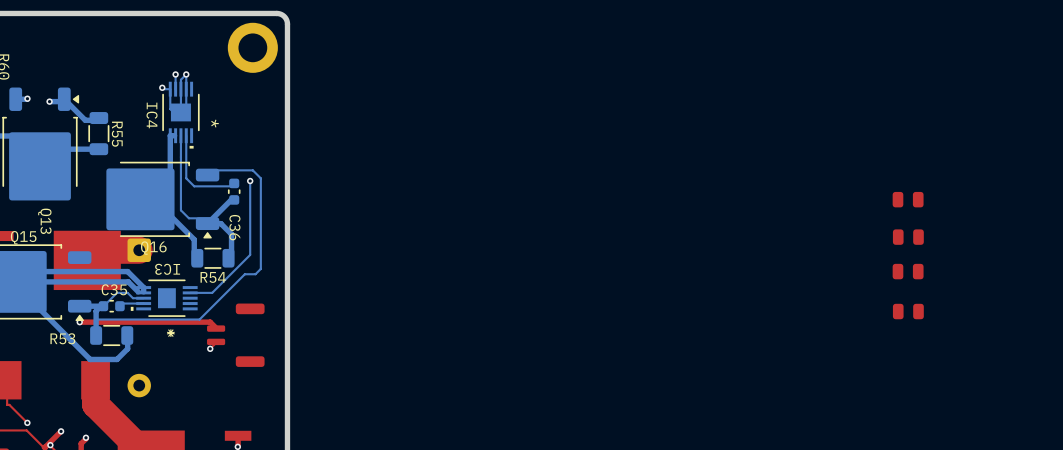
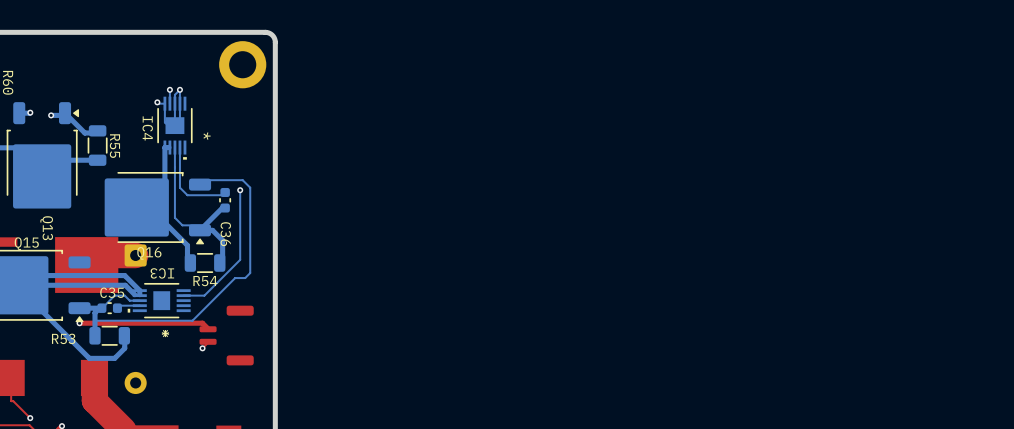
part: (908, 199) -> none
part: (908, 237) -> none
part: (908, 271) -> none
part: (908, 311) -> none

